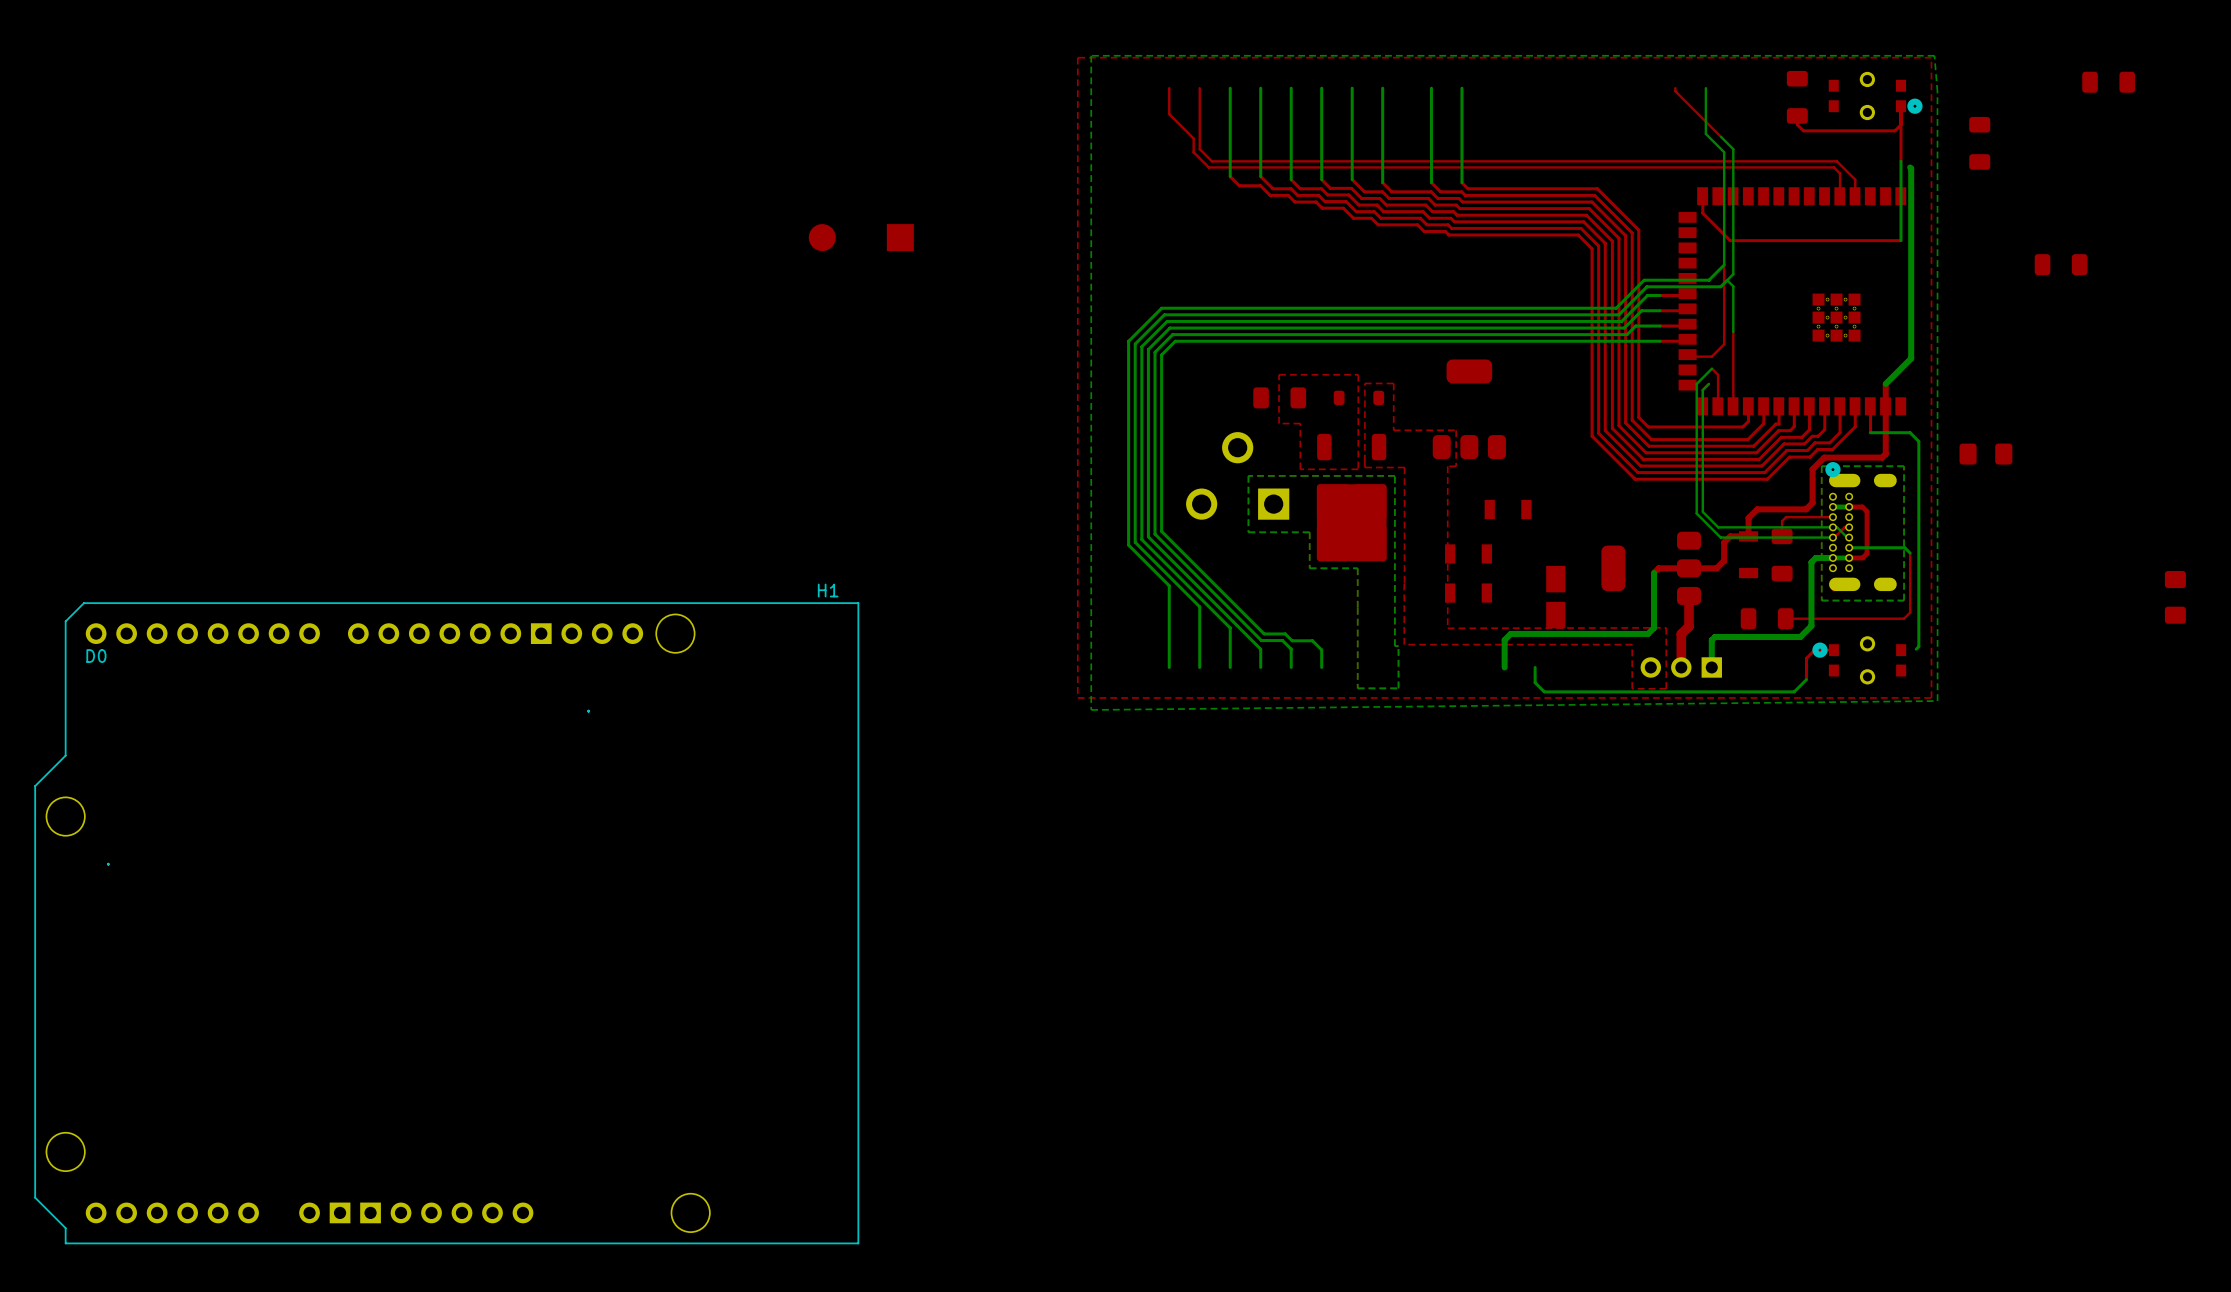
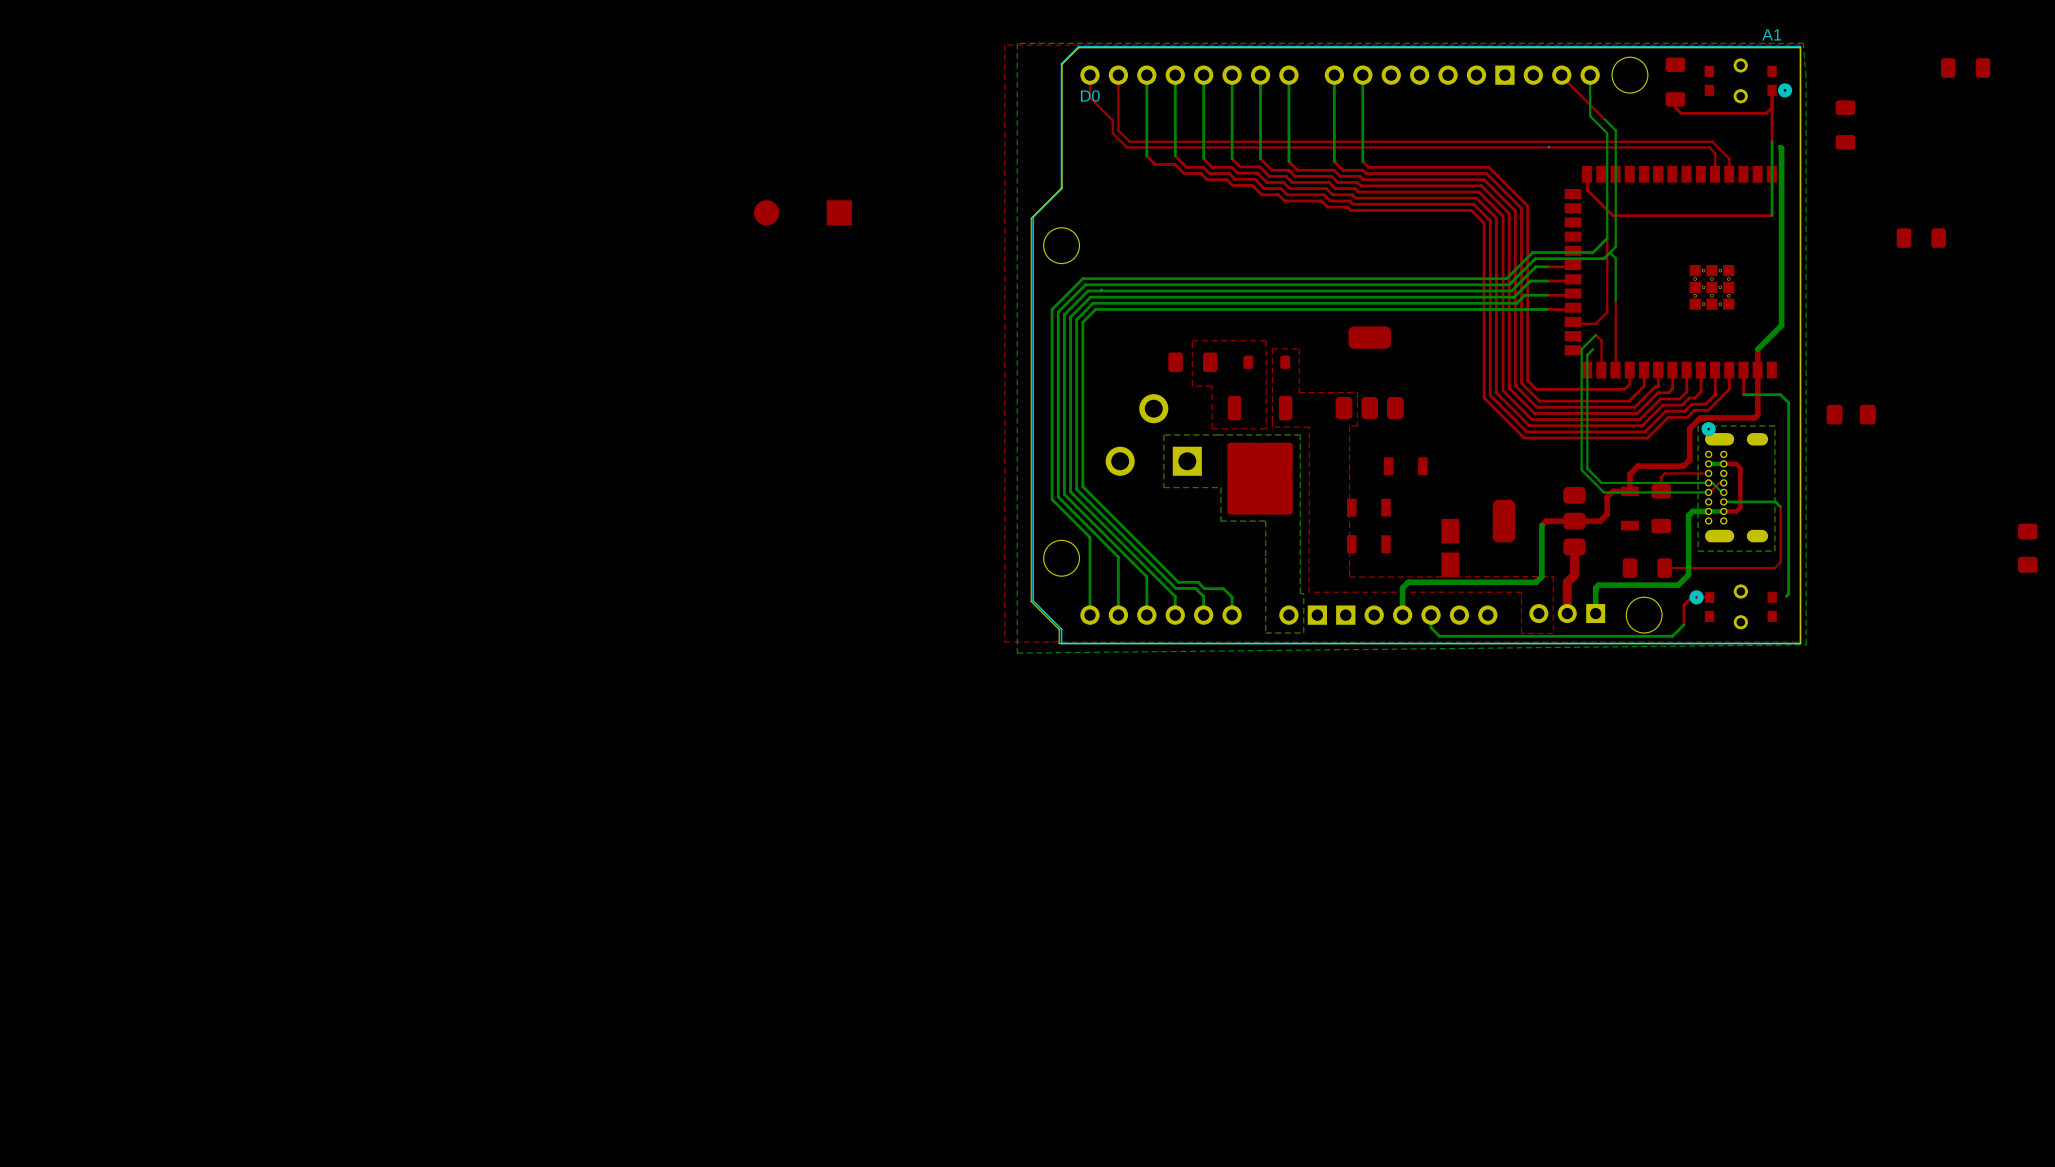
A1: none -> (1416, 345)
H1: (446, 923) -> none

